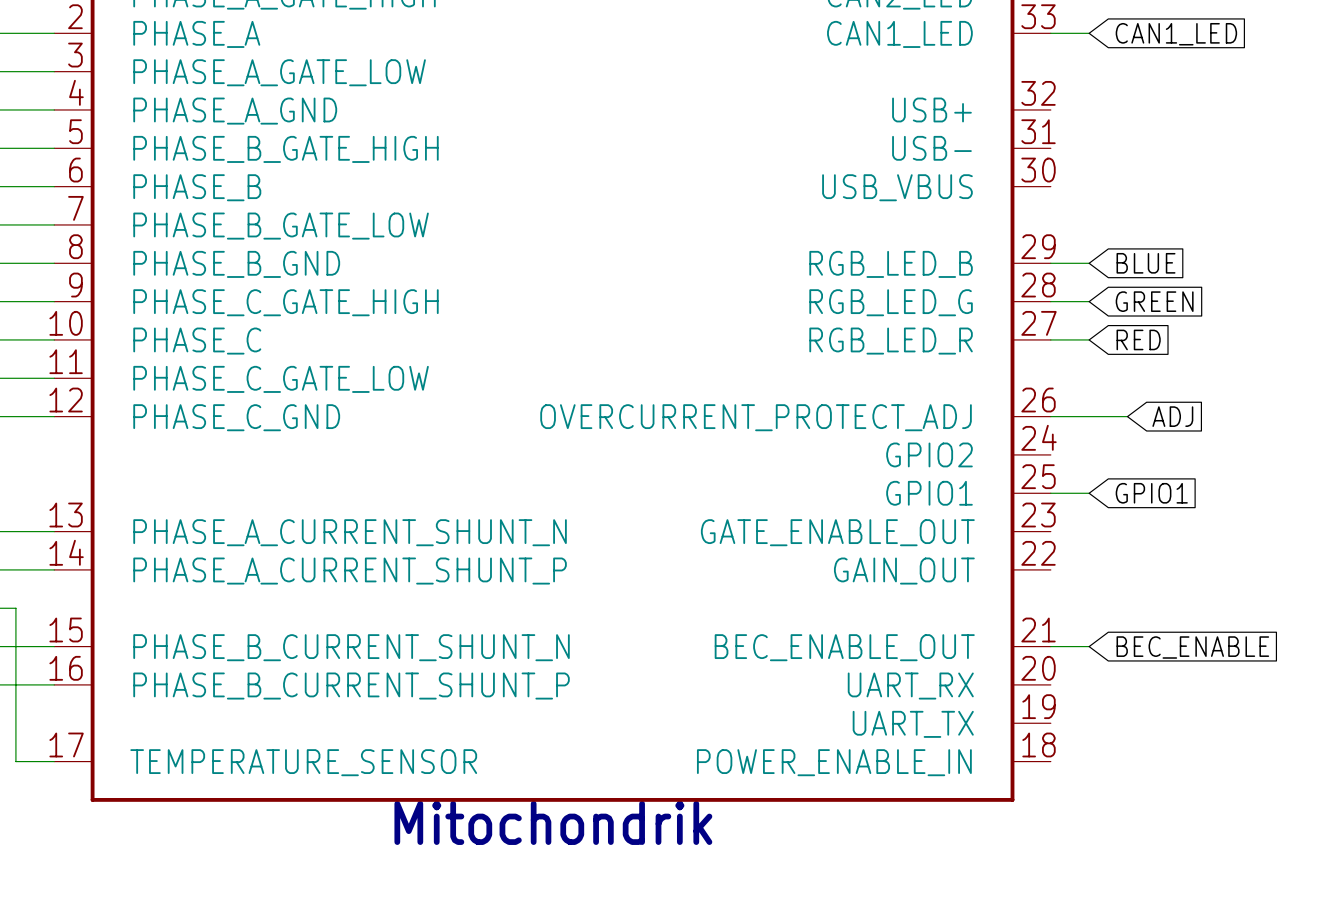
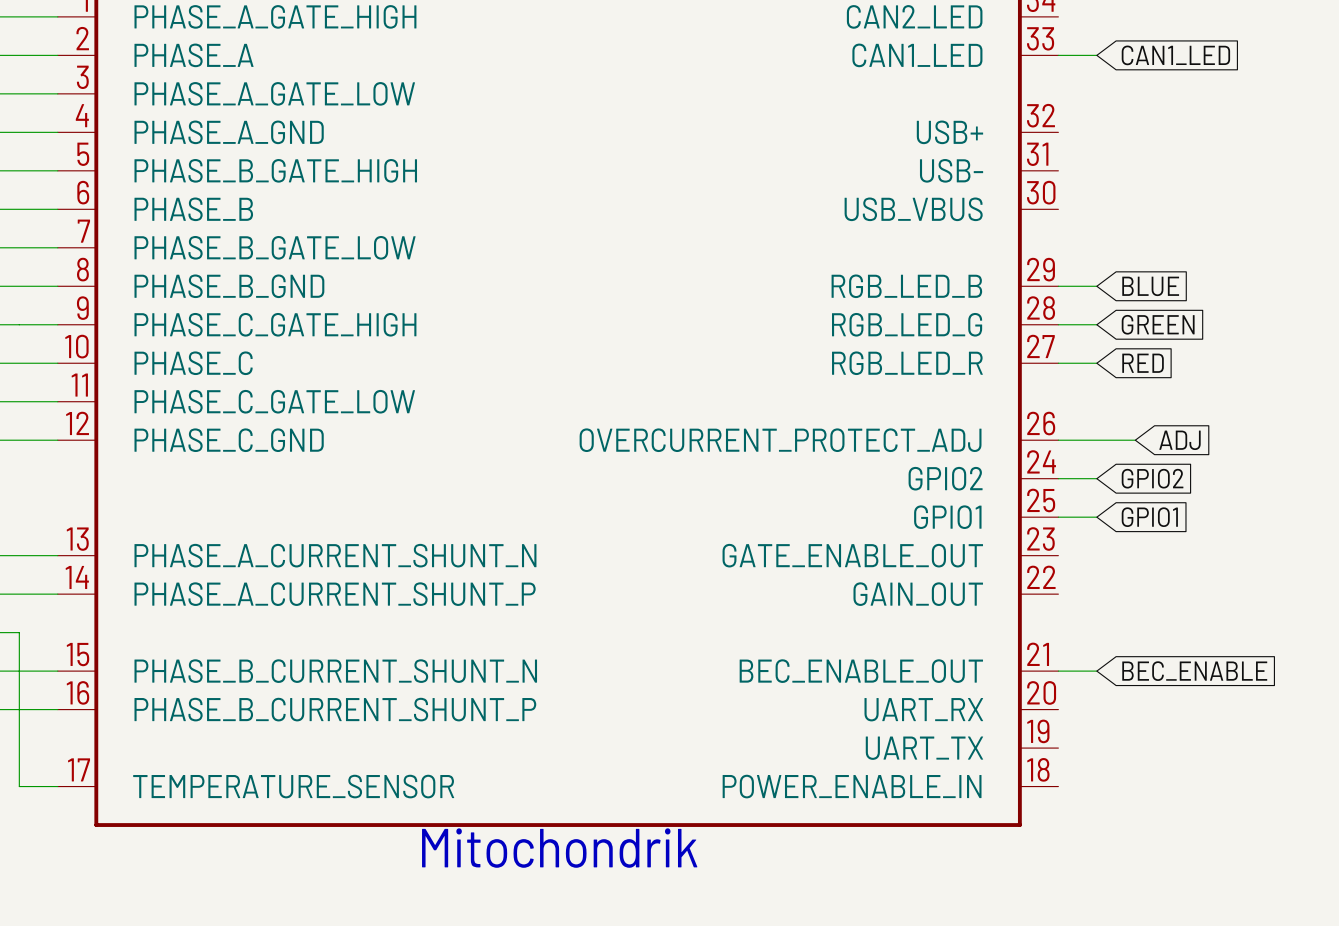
wire: none -> (1058, 478) (1096, 478)
global label: none -> GPIO2 (1152, 478)

